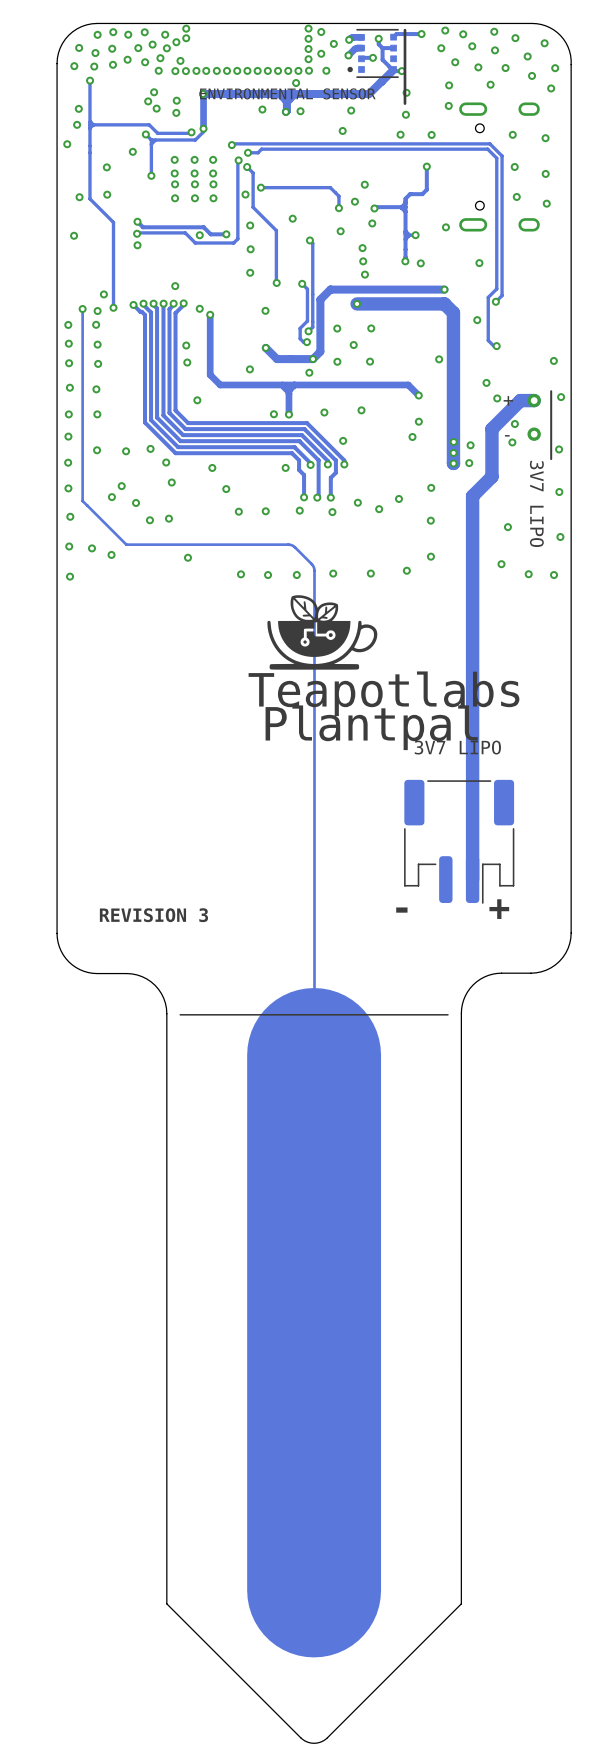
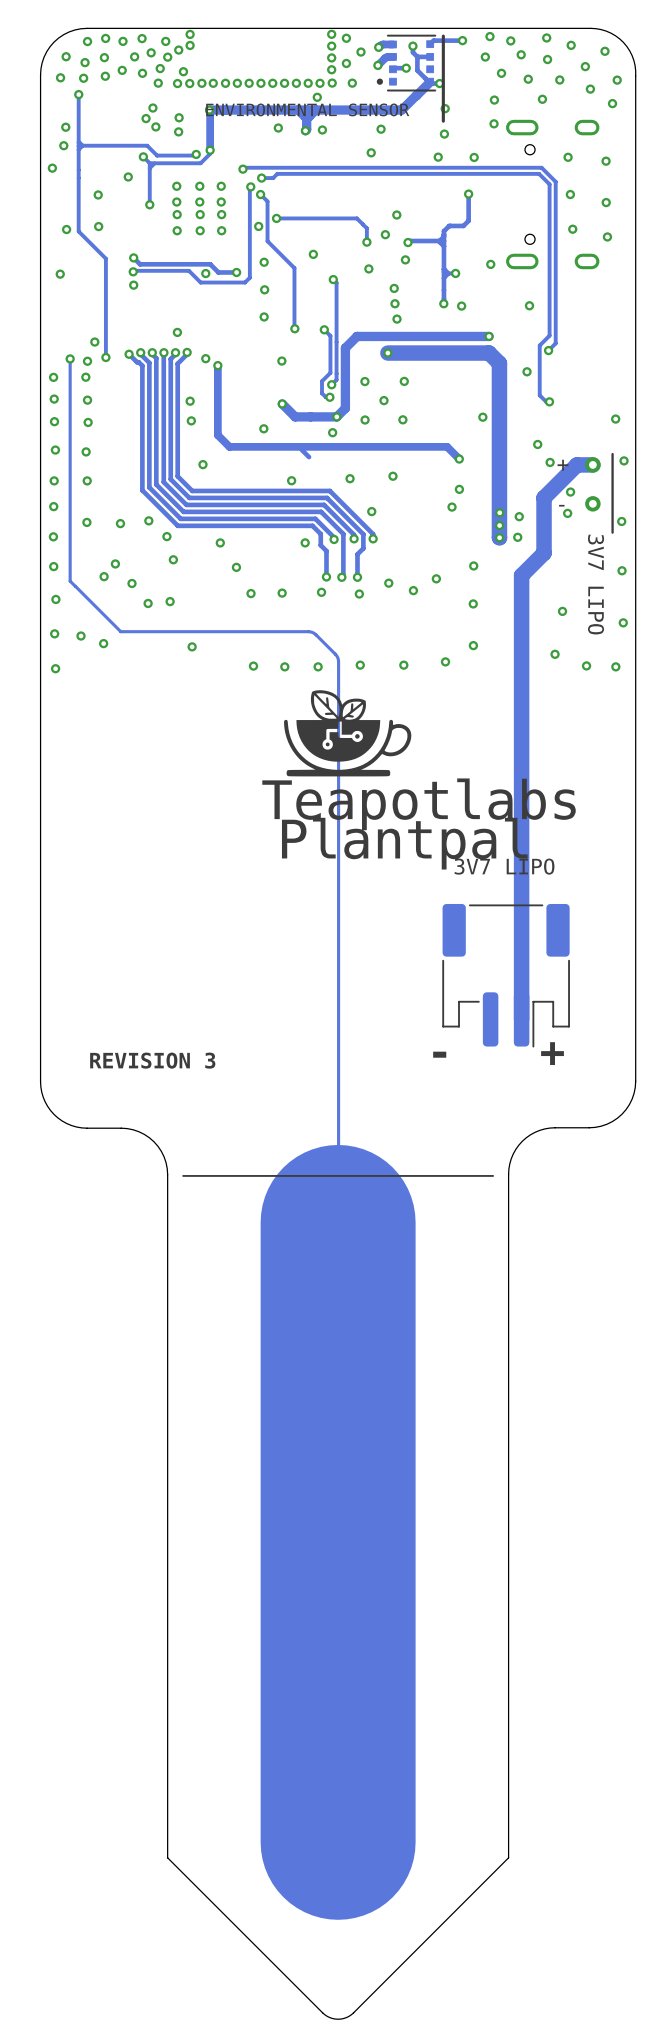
track: (294, 384) (288, 390) (288, 414) -> none
via: (288, 414) -> none

